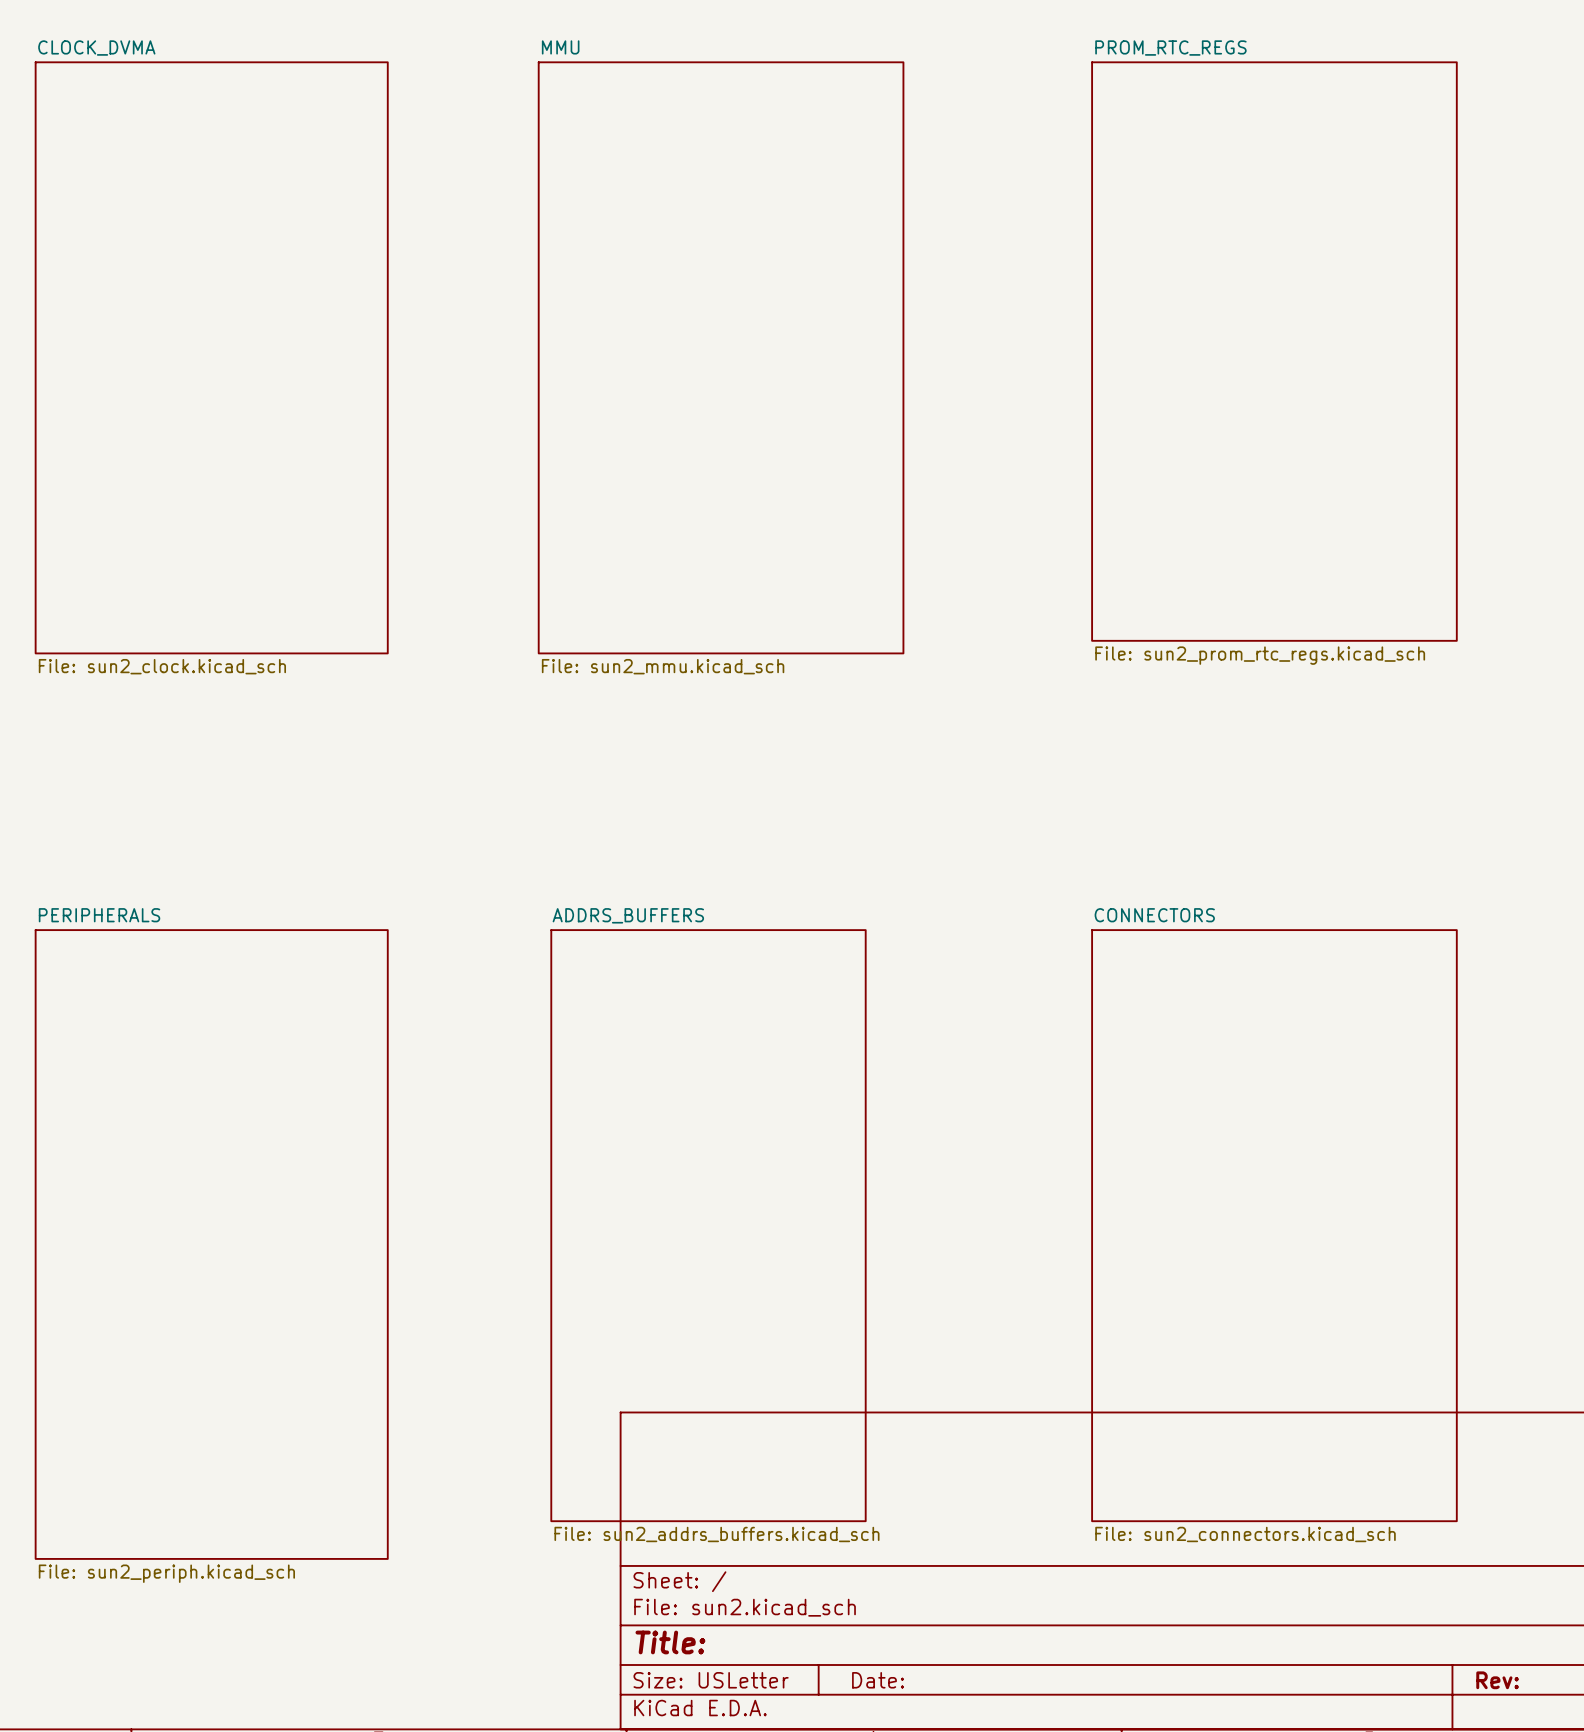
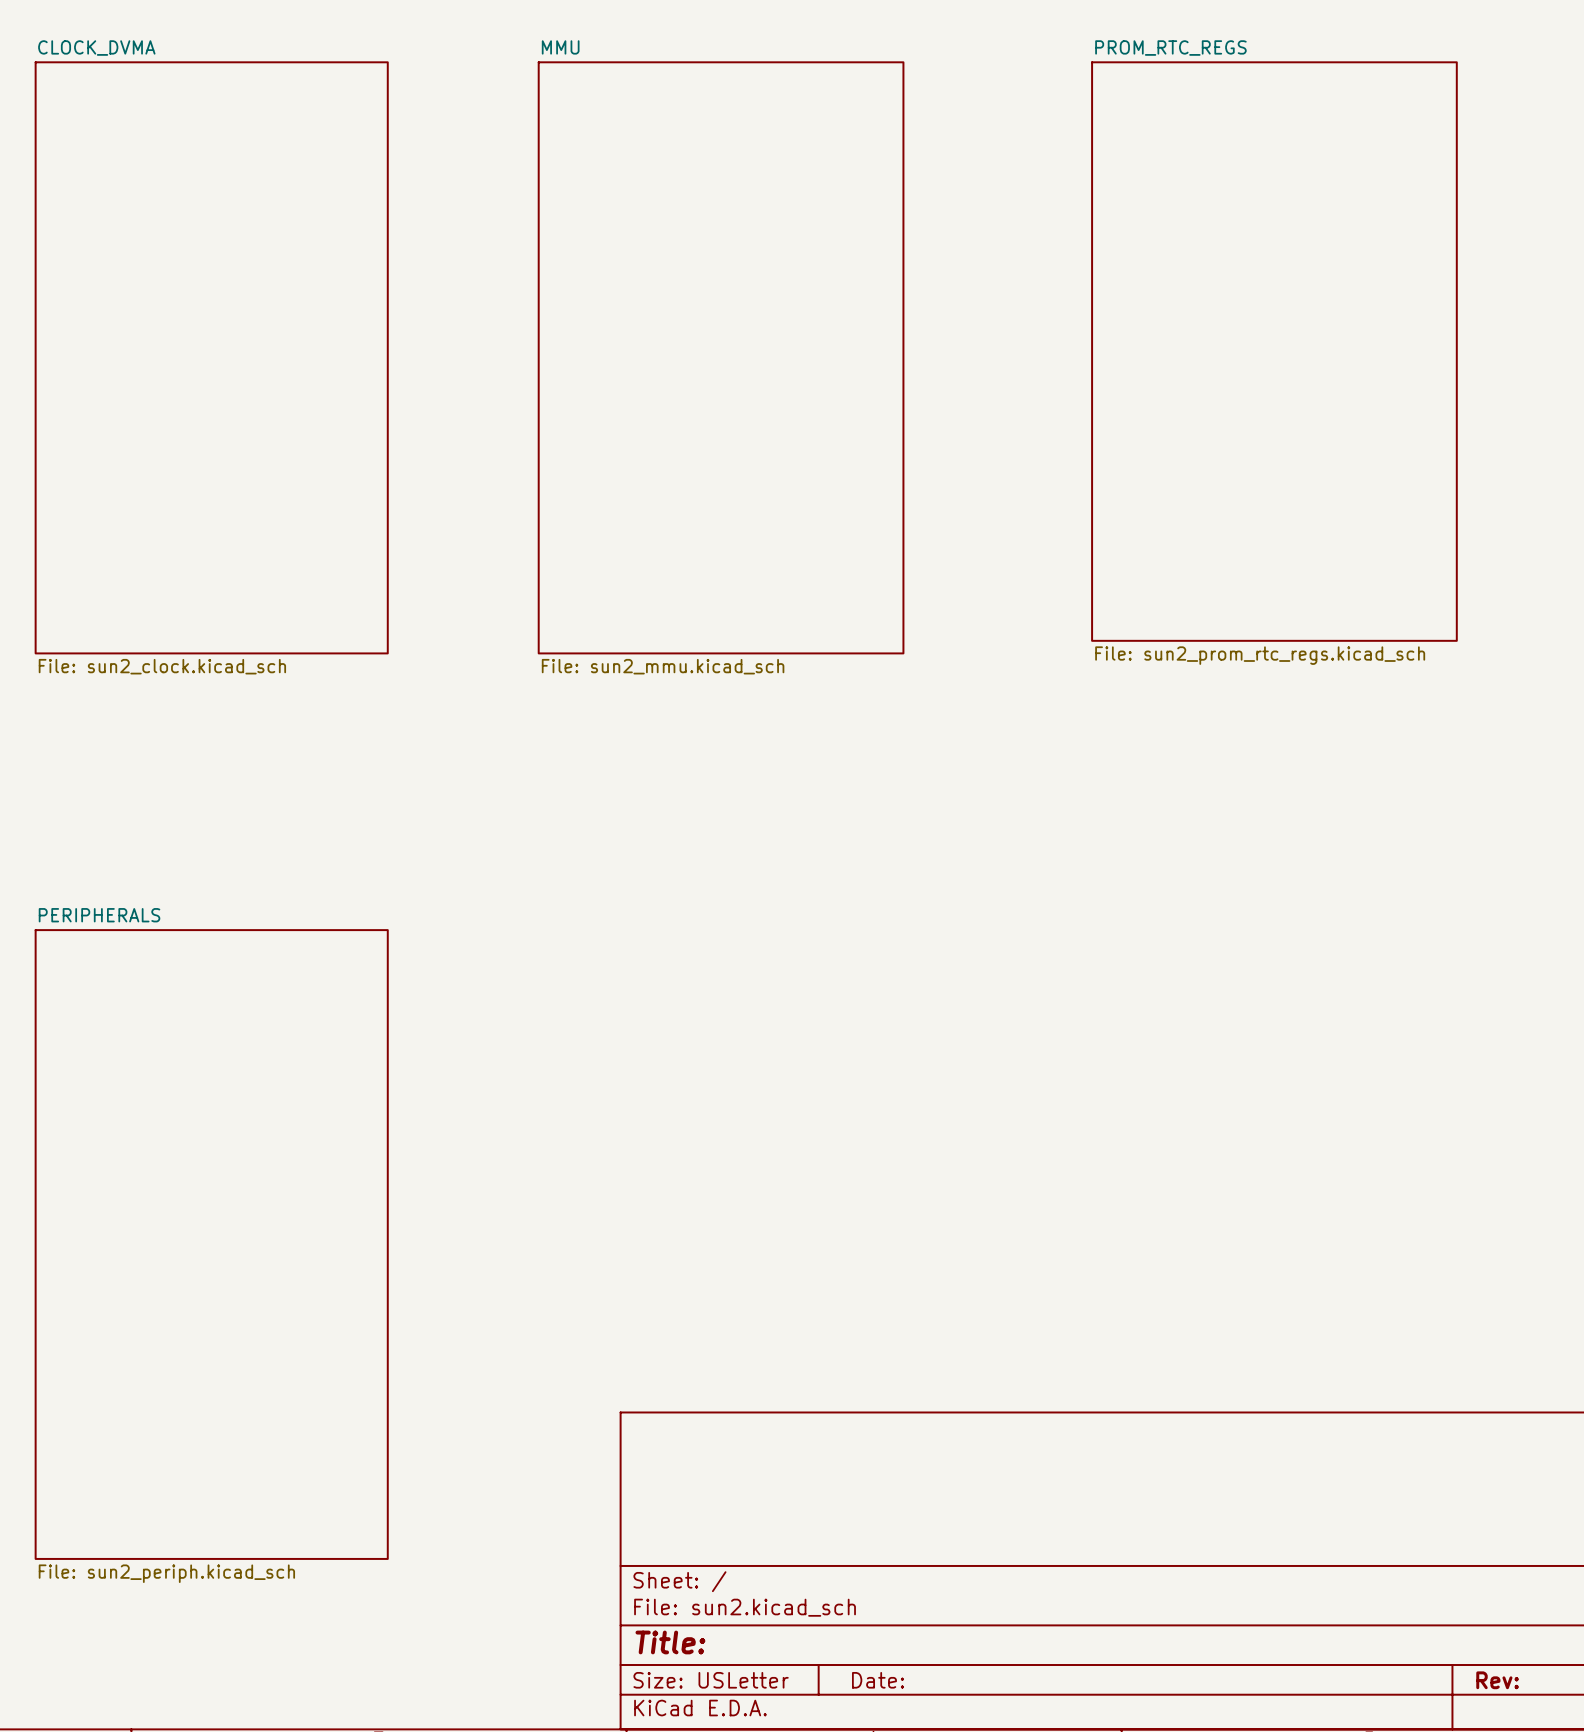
sheet ADDRS_BUFFERS: File: sun2_addrs_buffers.kicad_sch (708, 1225) -> none
sheet CONNECTORS: File: sun2_connectors.kicad_sch (1274, 1225) -> none

